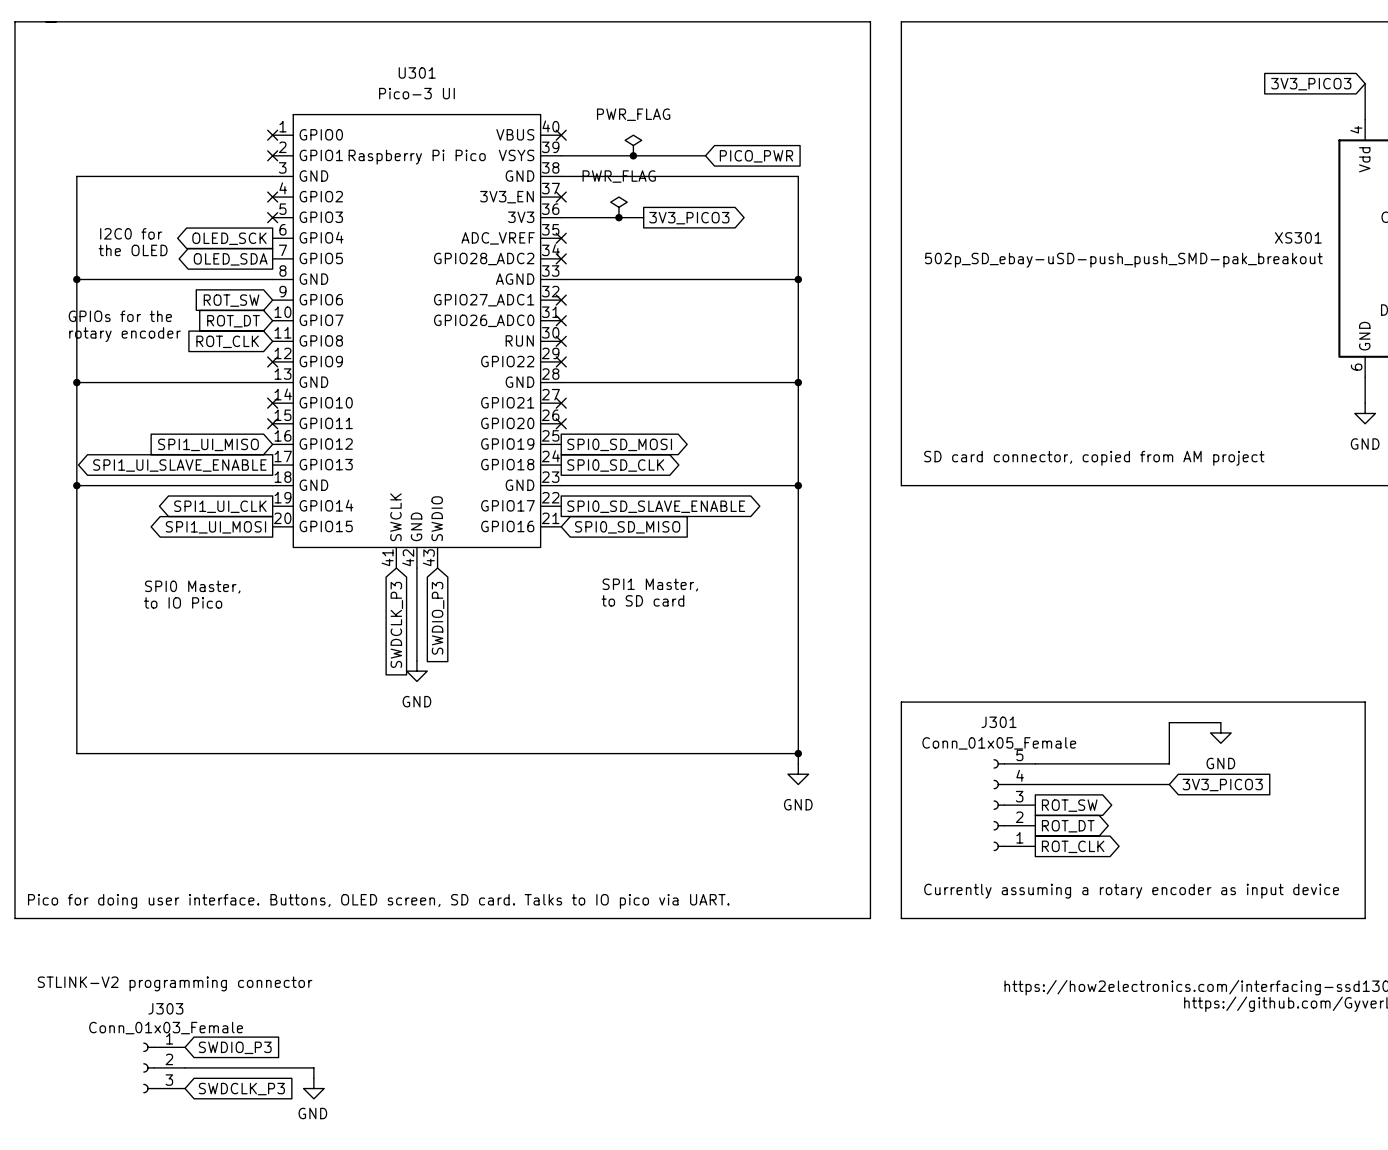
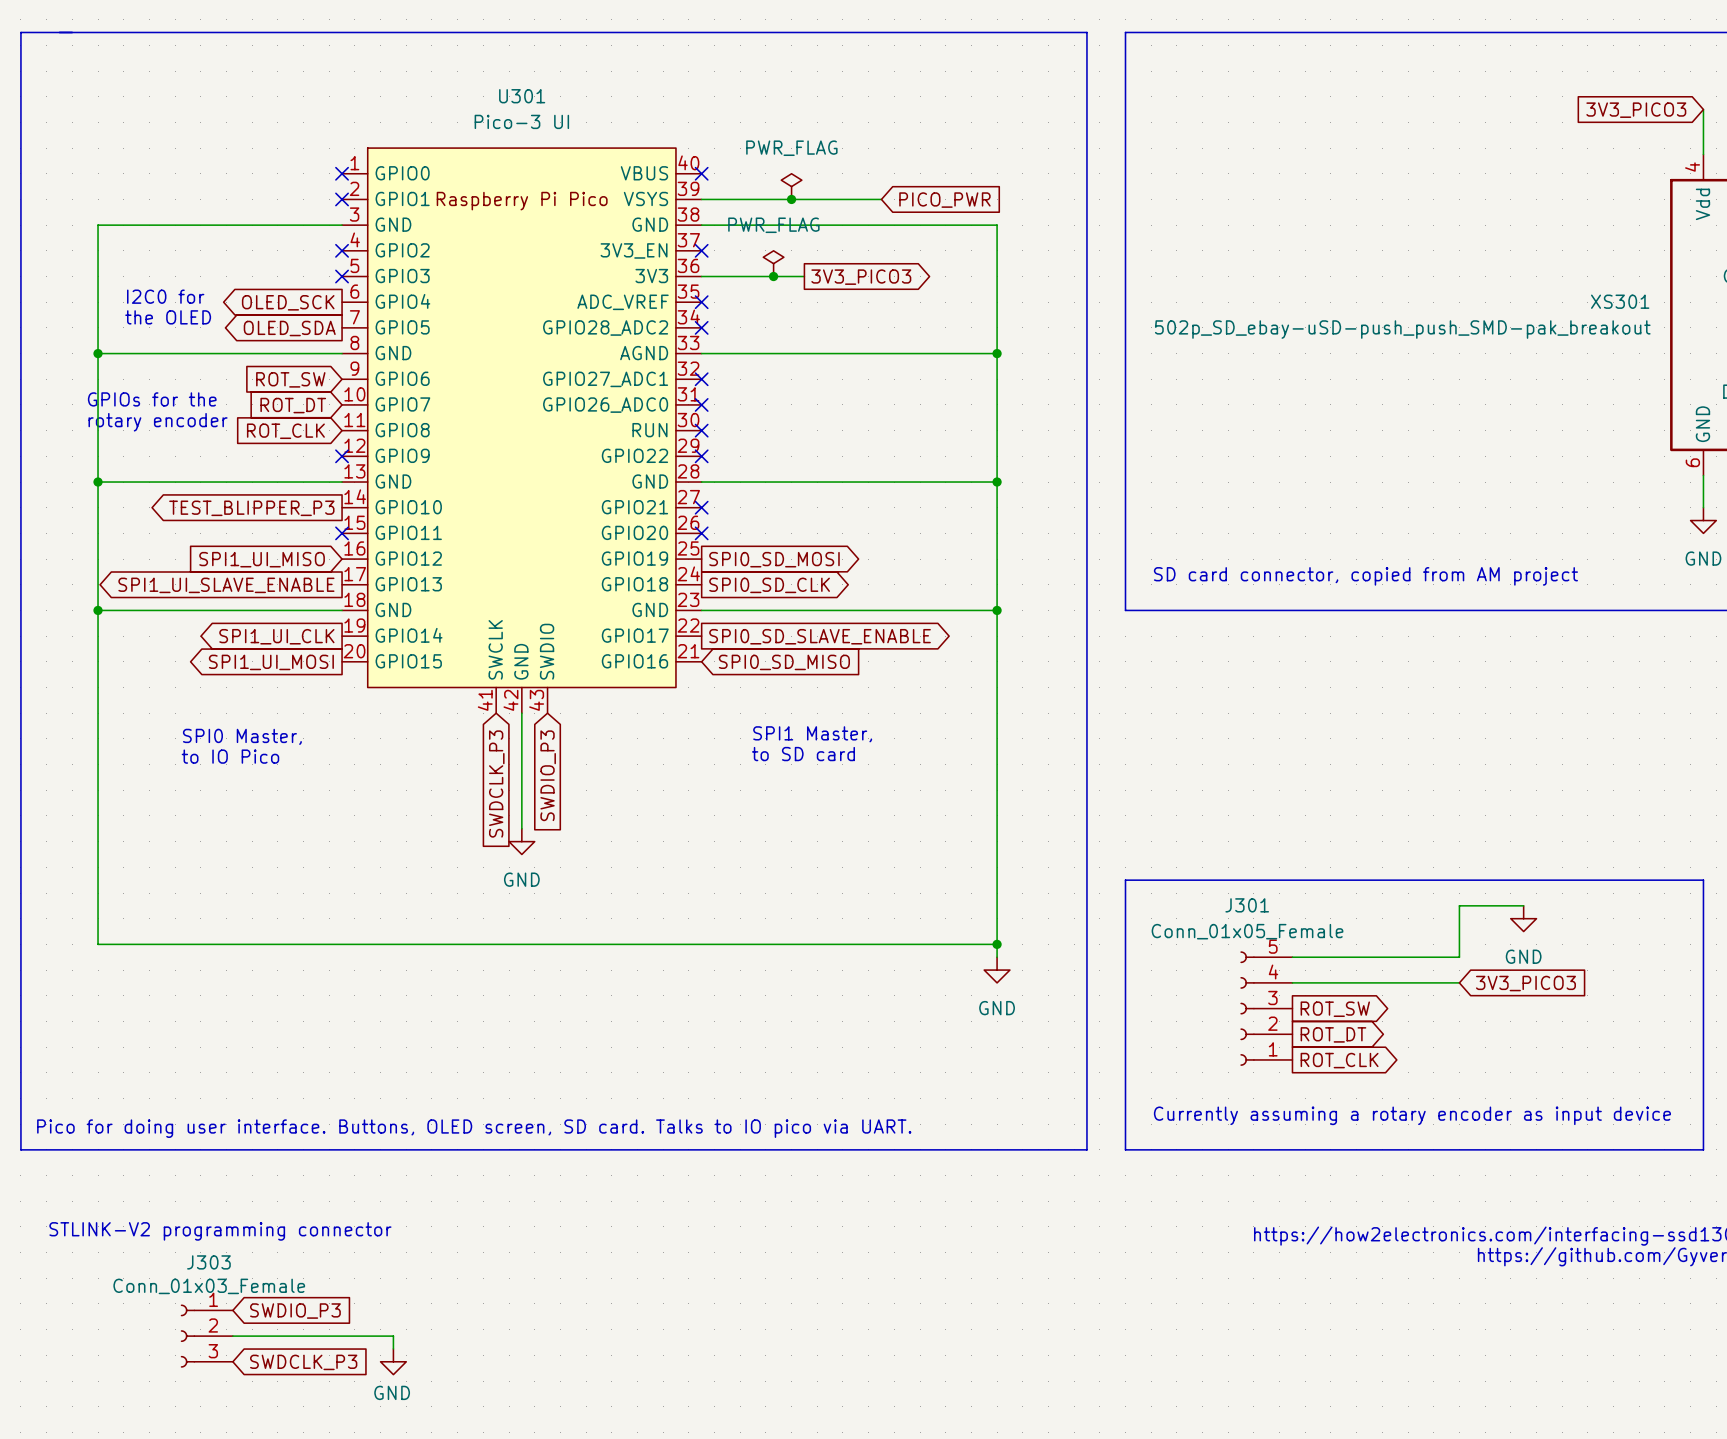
global label: none -> TEST_BLIPPER_P3 (251, 508)
no-connect mark: (272, 403) -> none

